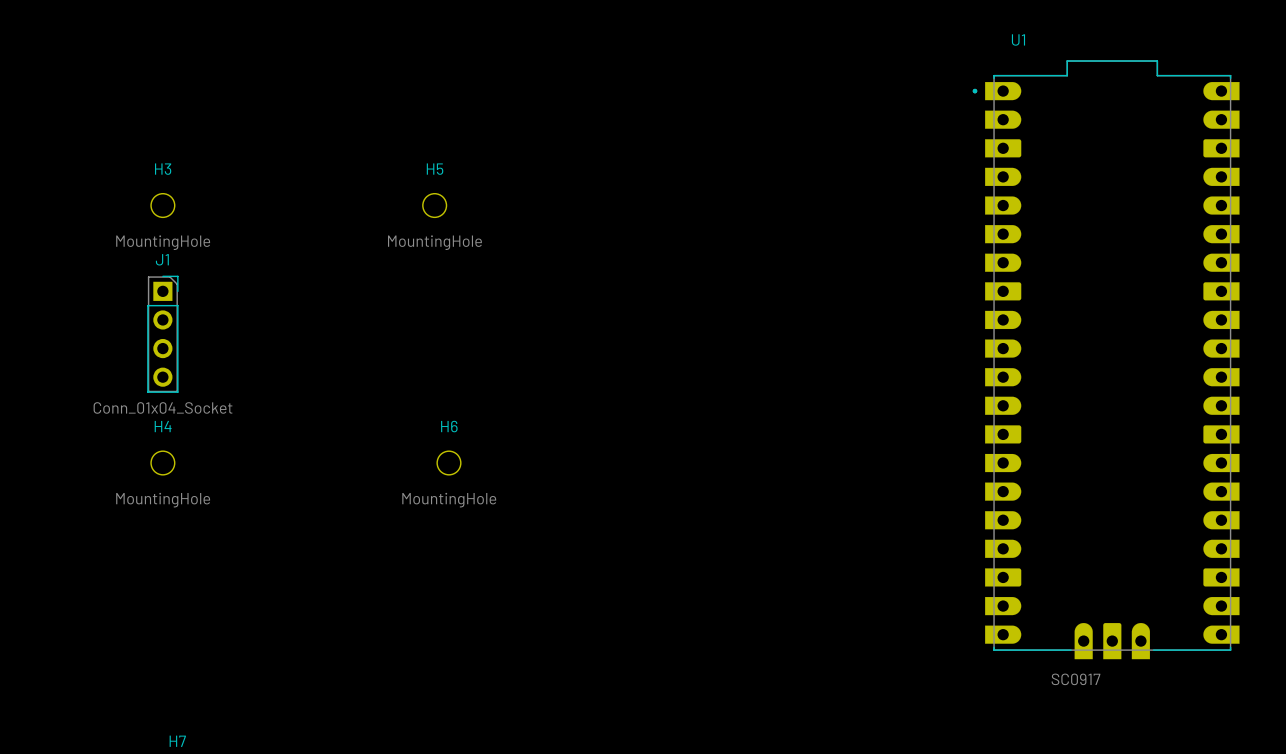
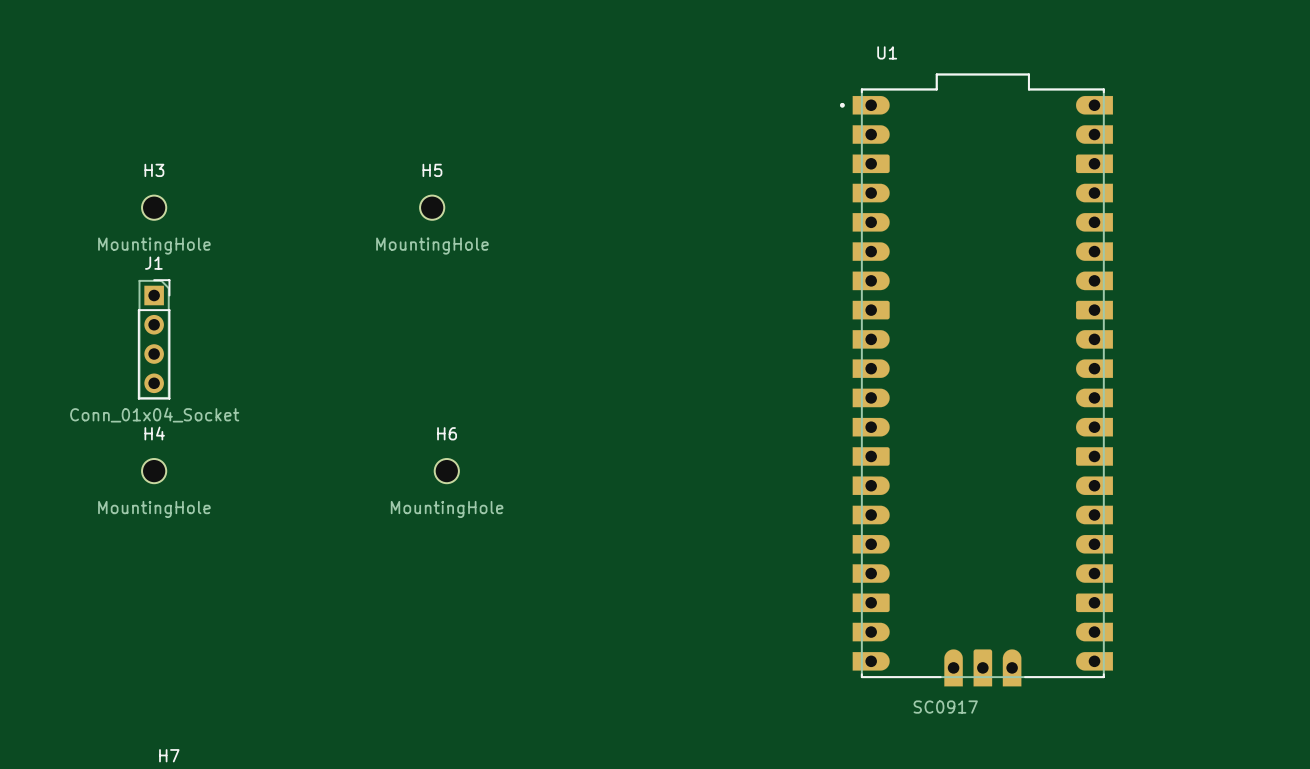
U1 position: (1106, 359) -> (976, 380)

